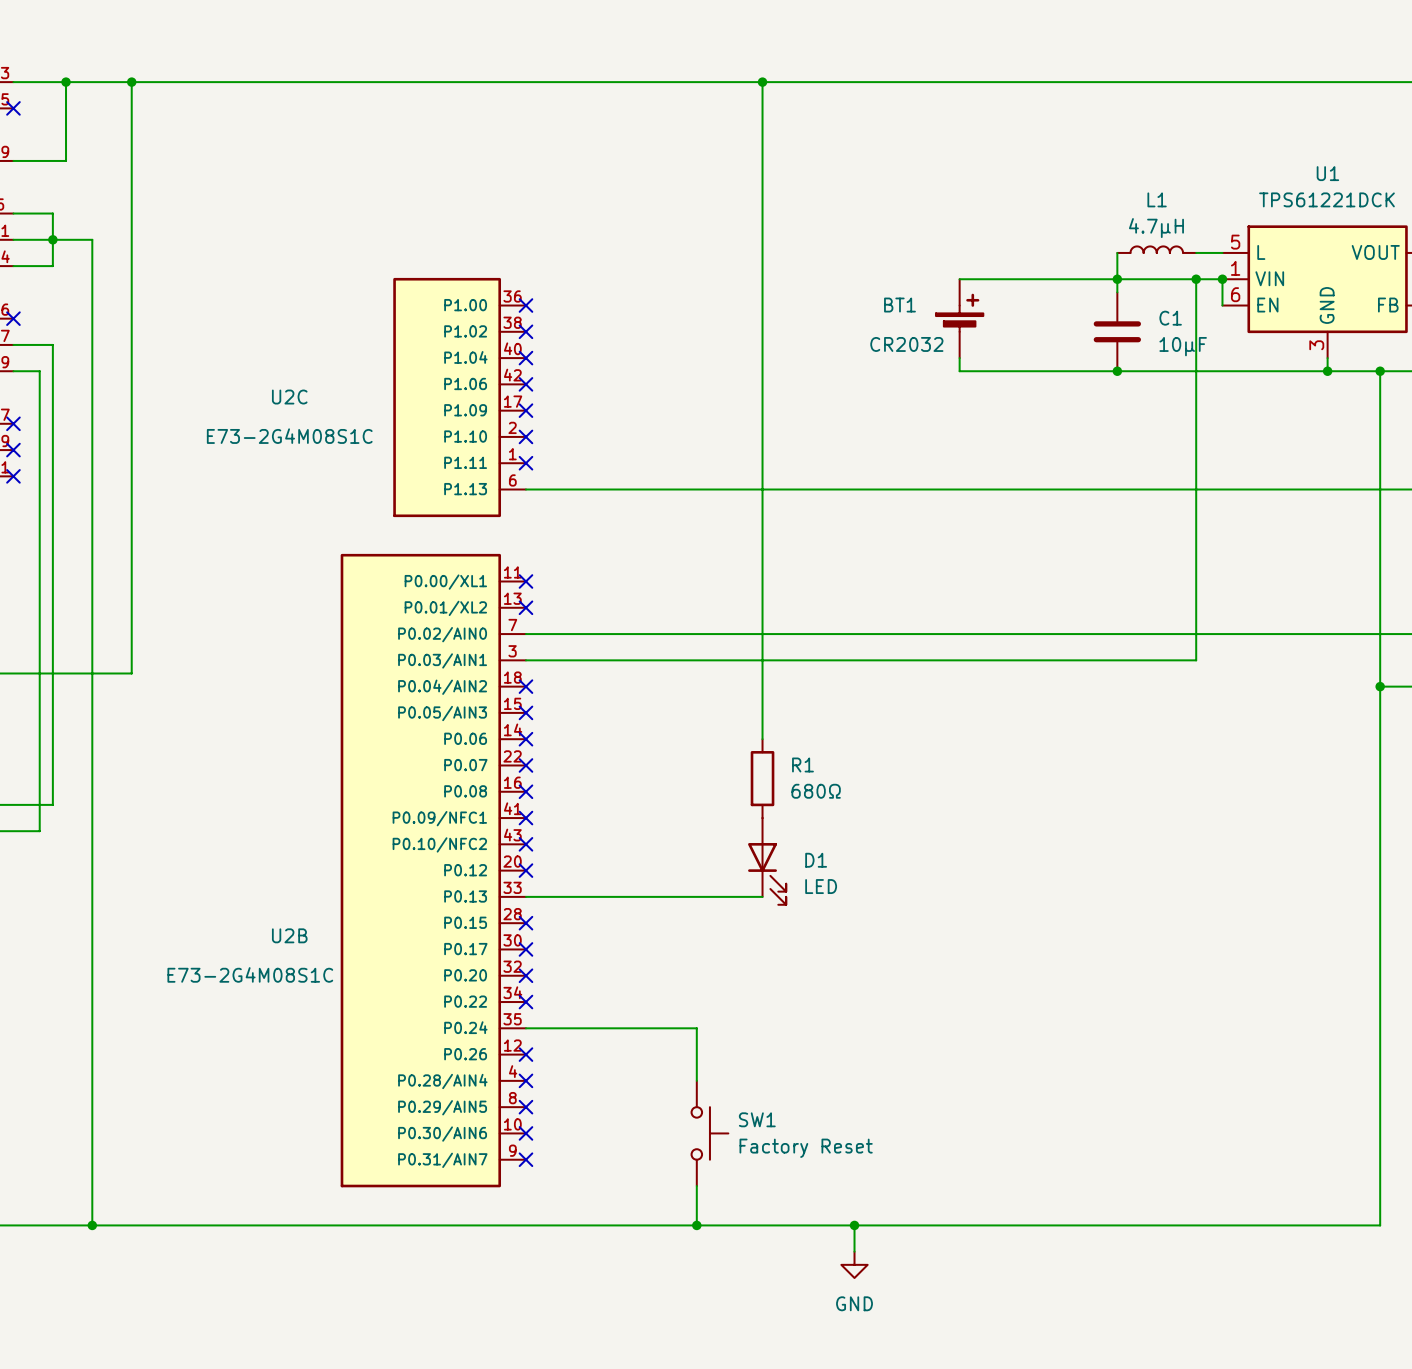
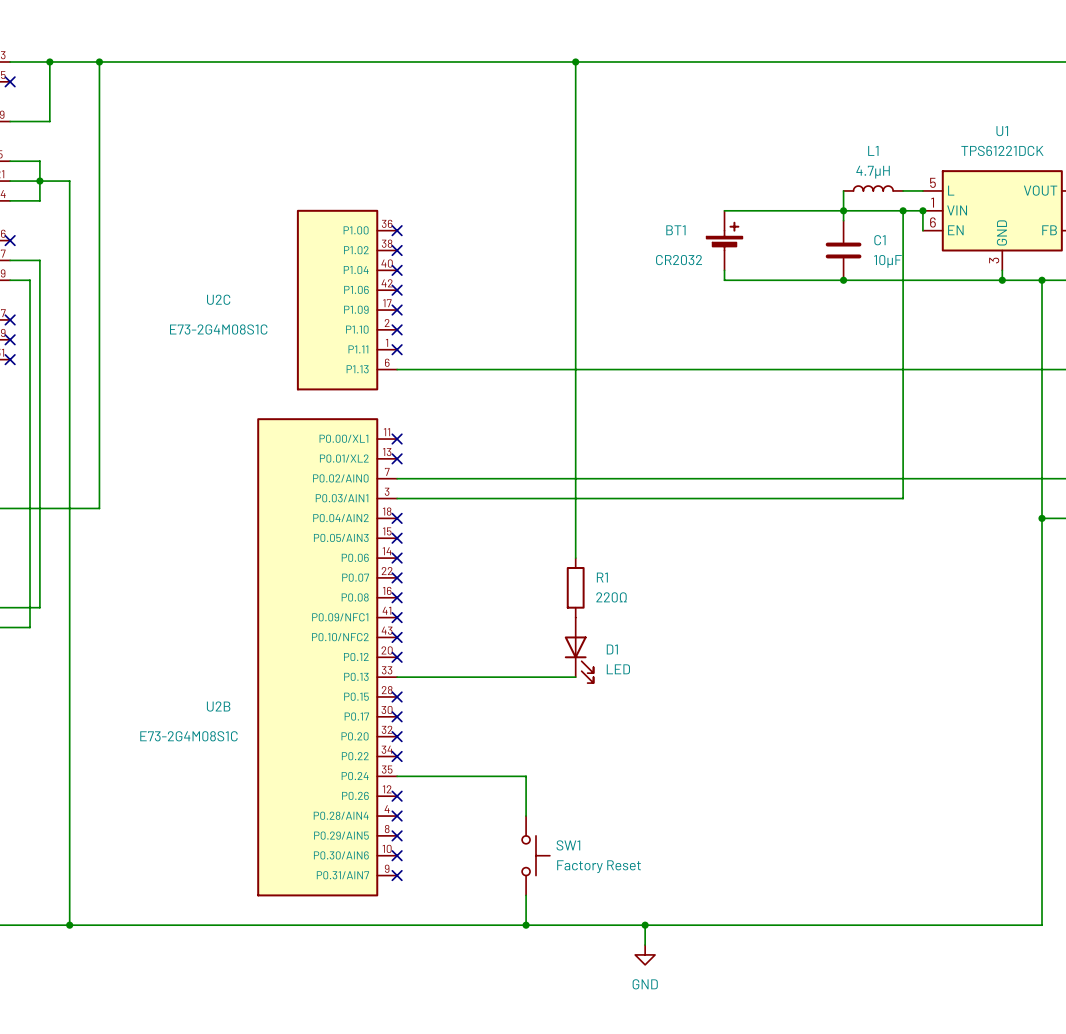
R1 value: 680Ω (816, 791) -> 220Ω (611, 597)

